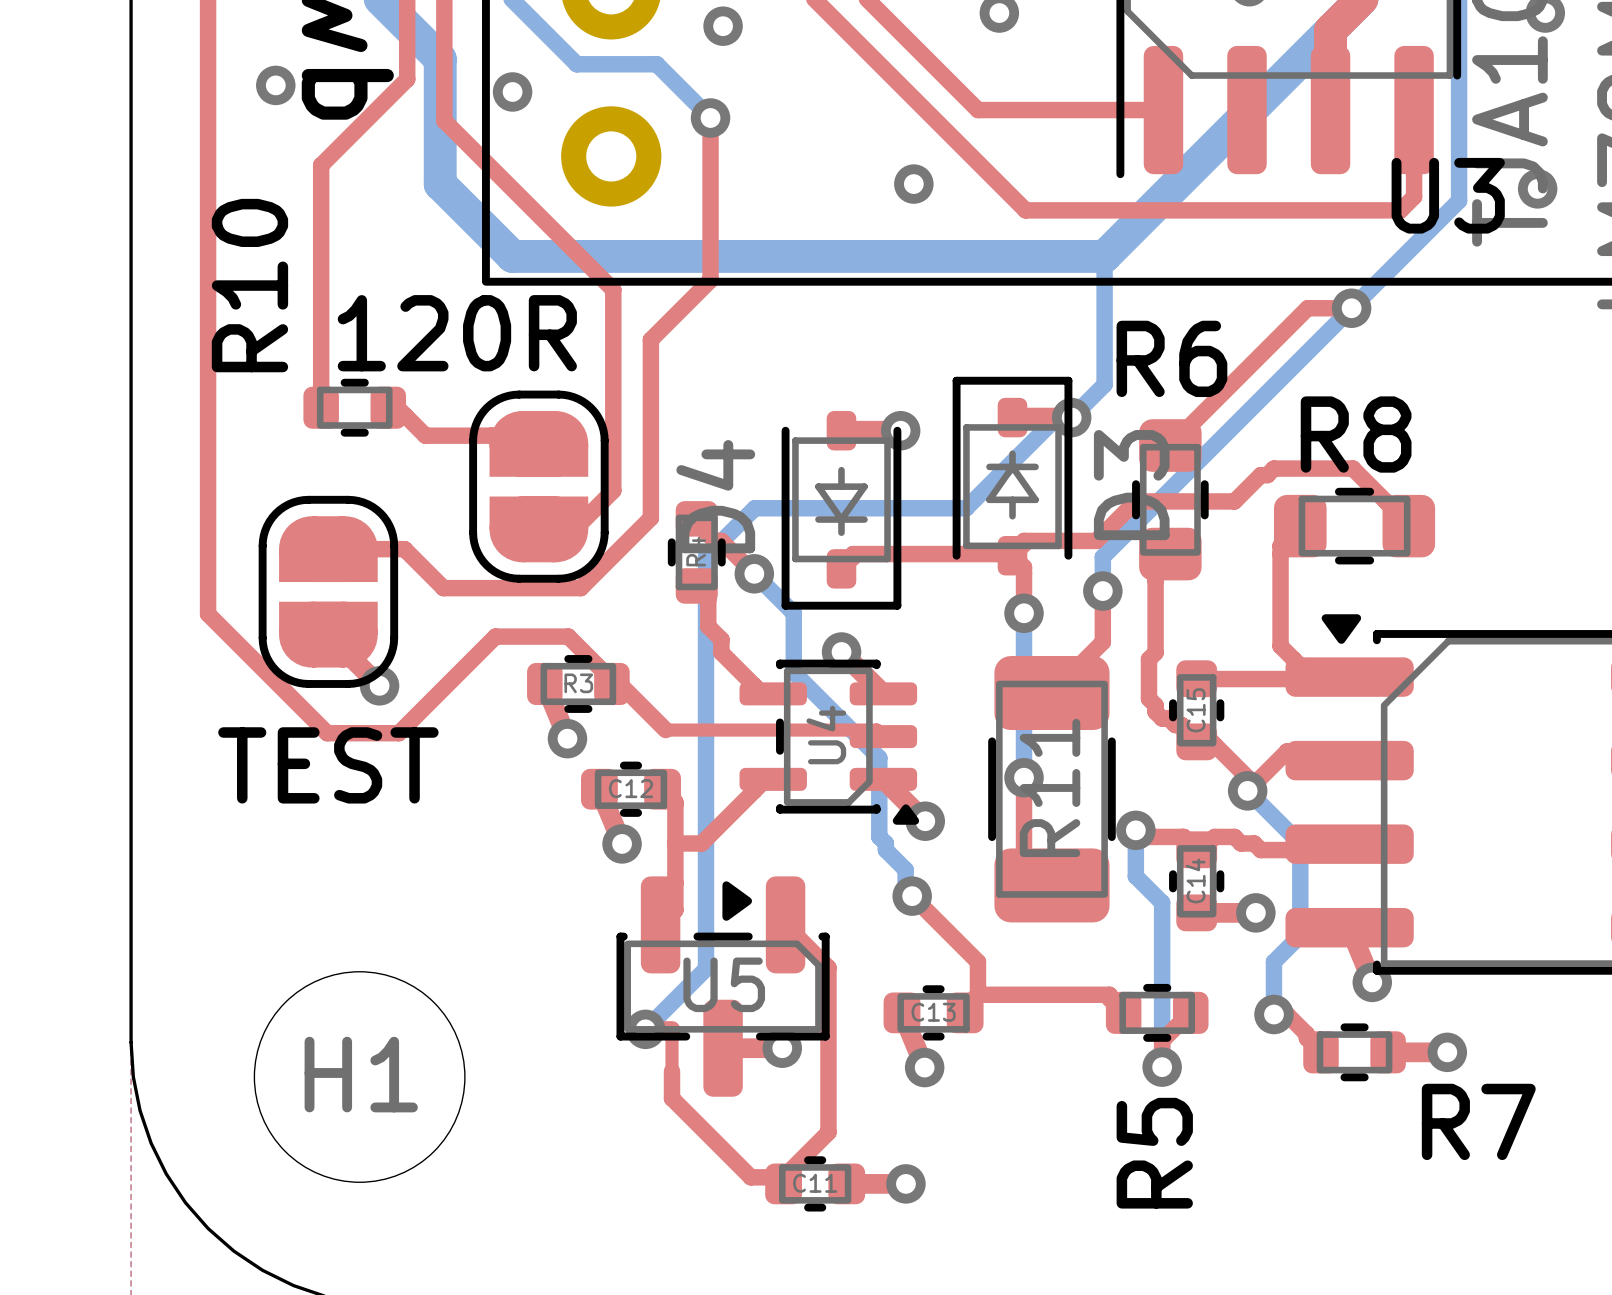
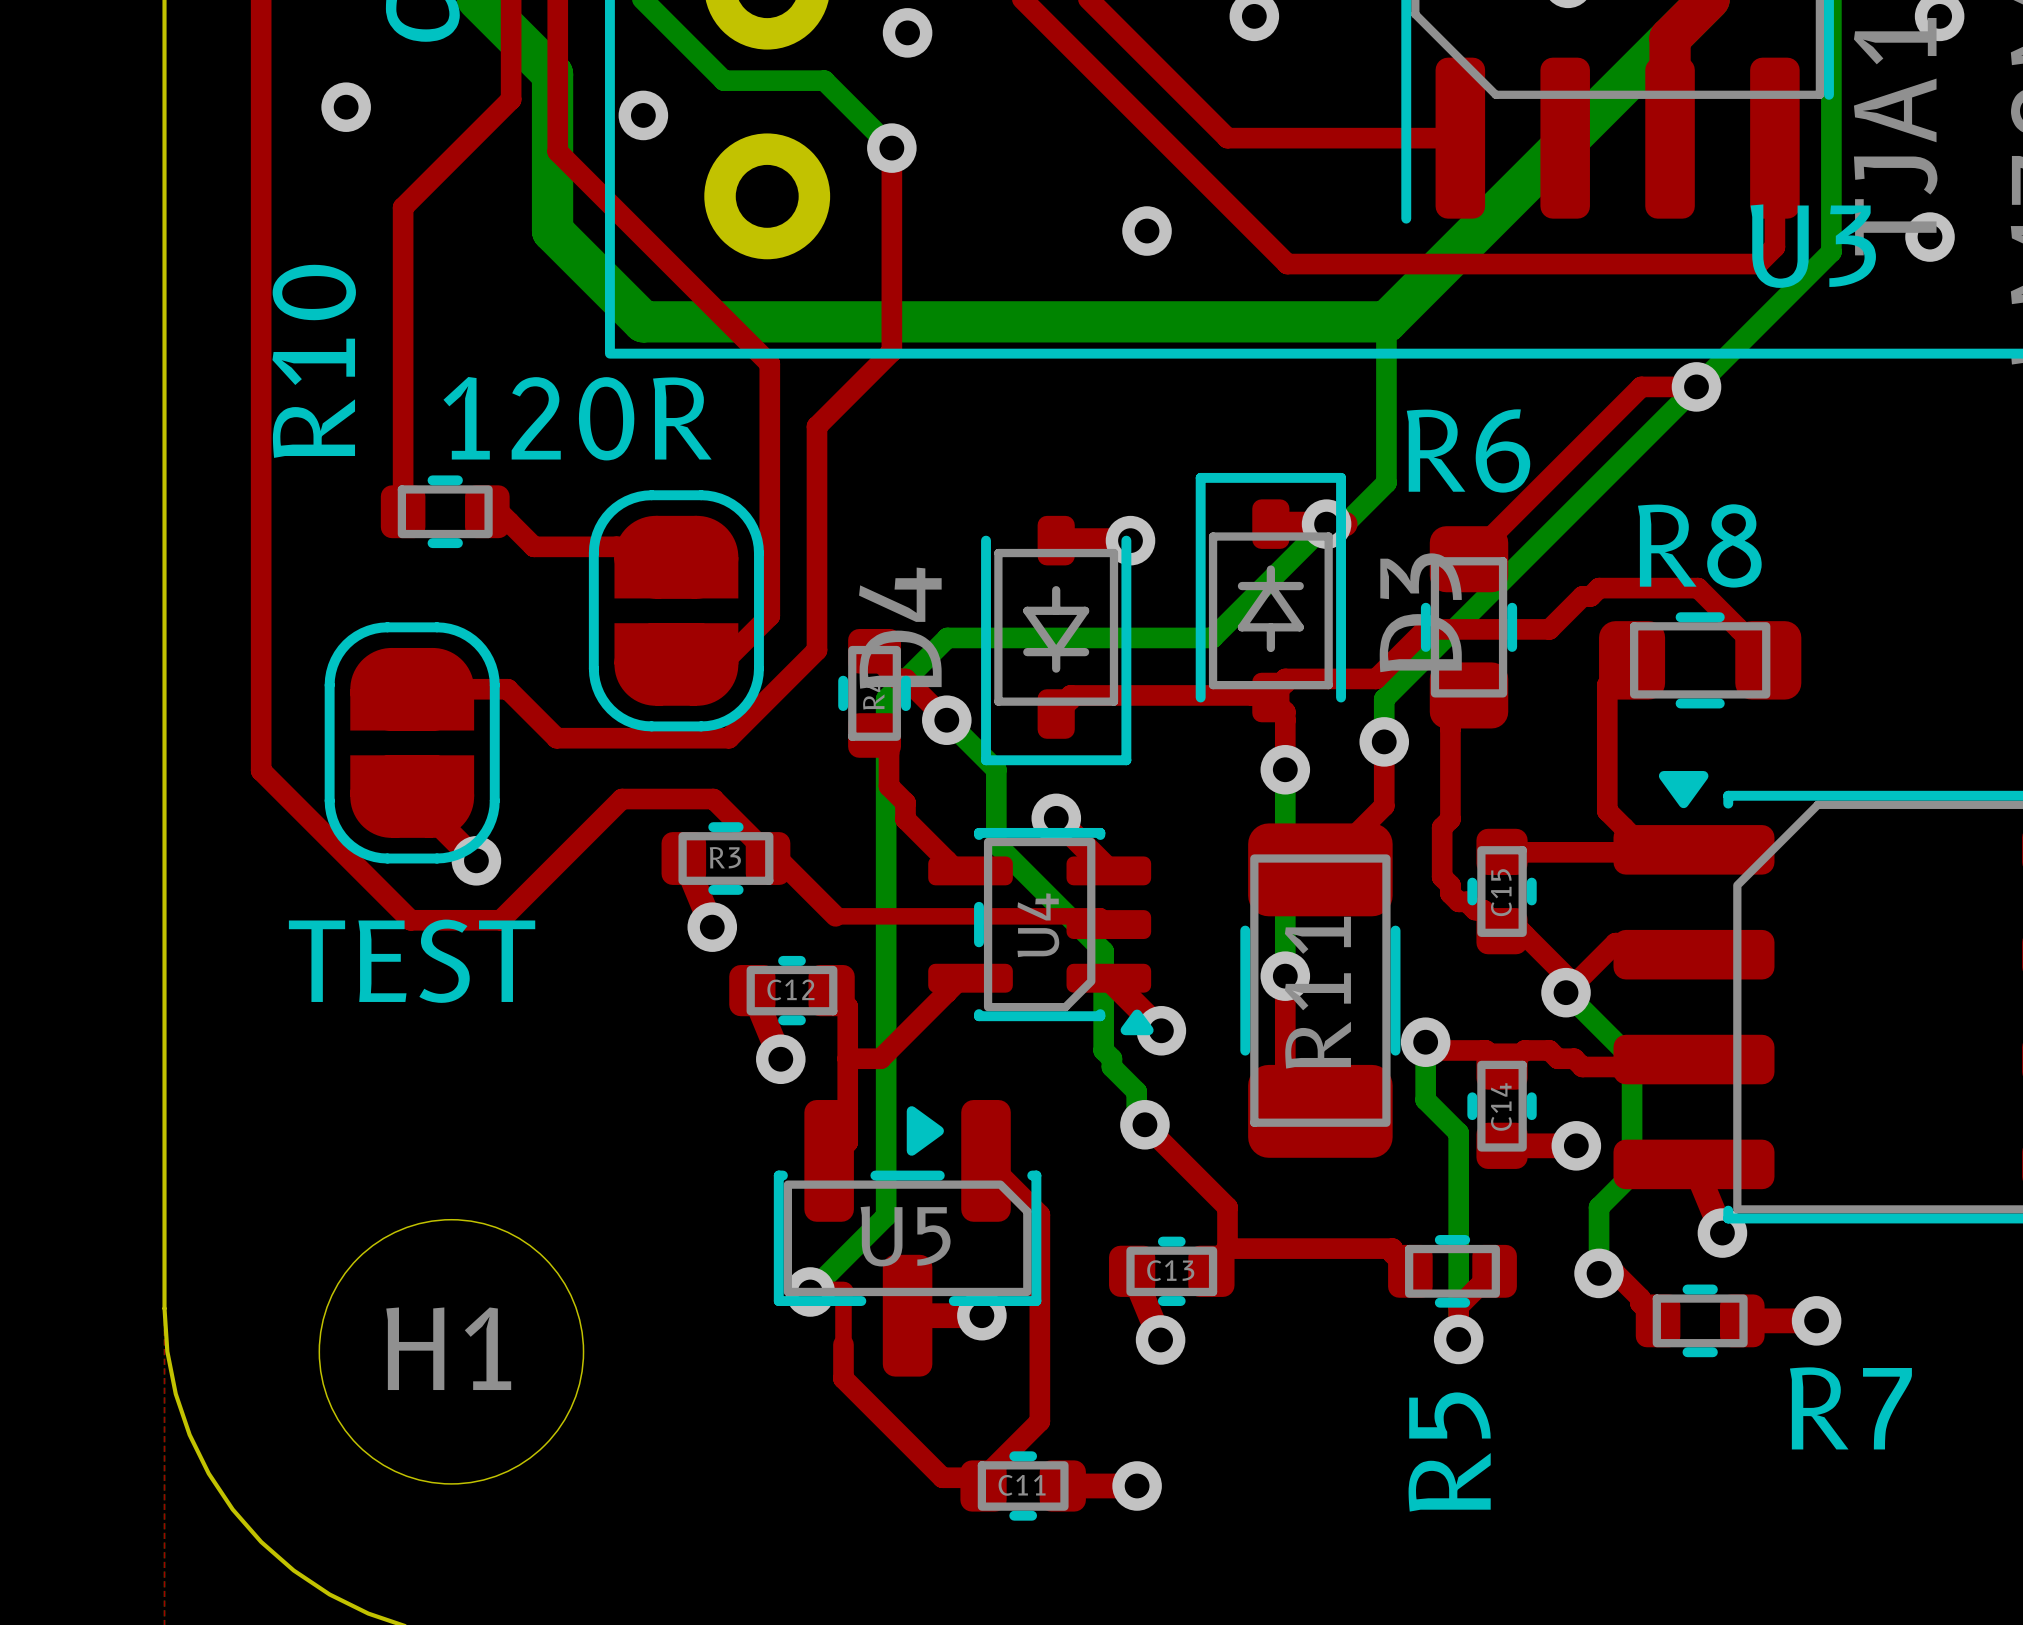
via position: (1071, 417) -> (1326, 524)

